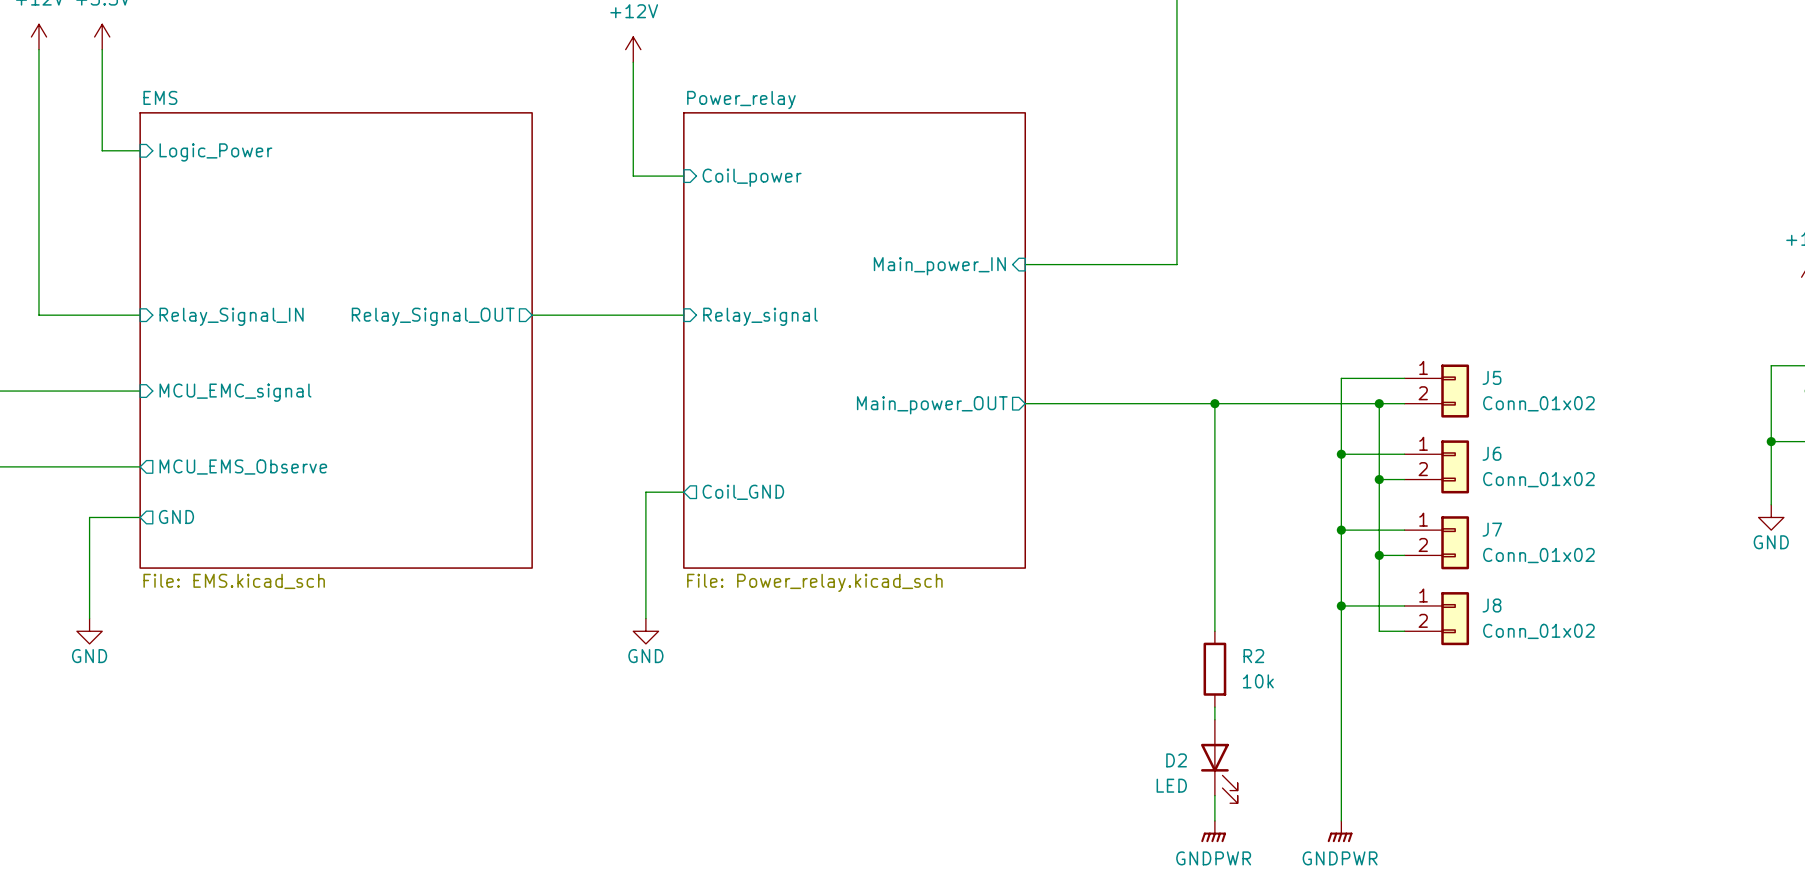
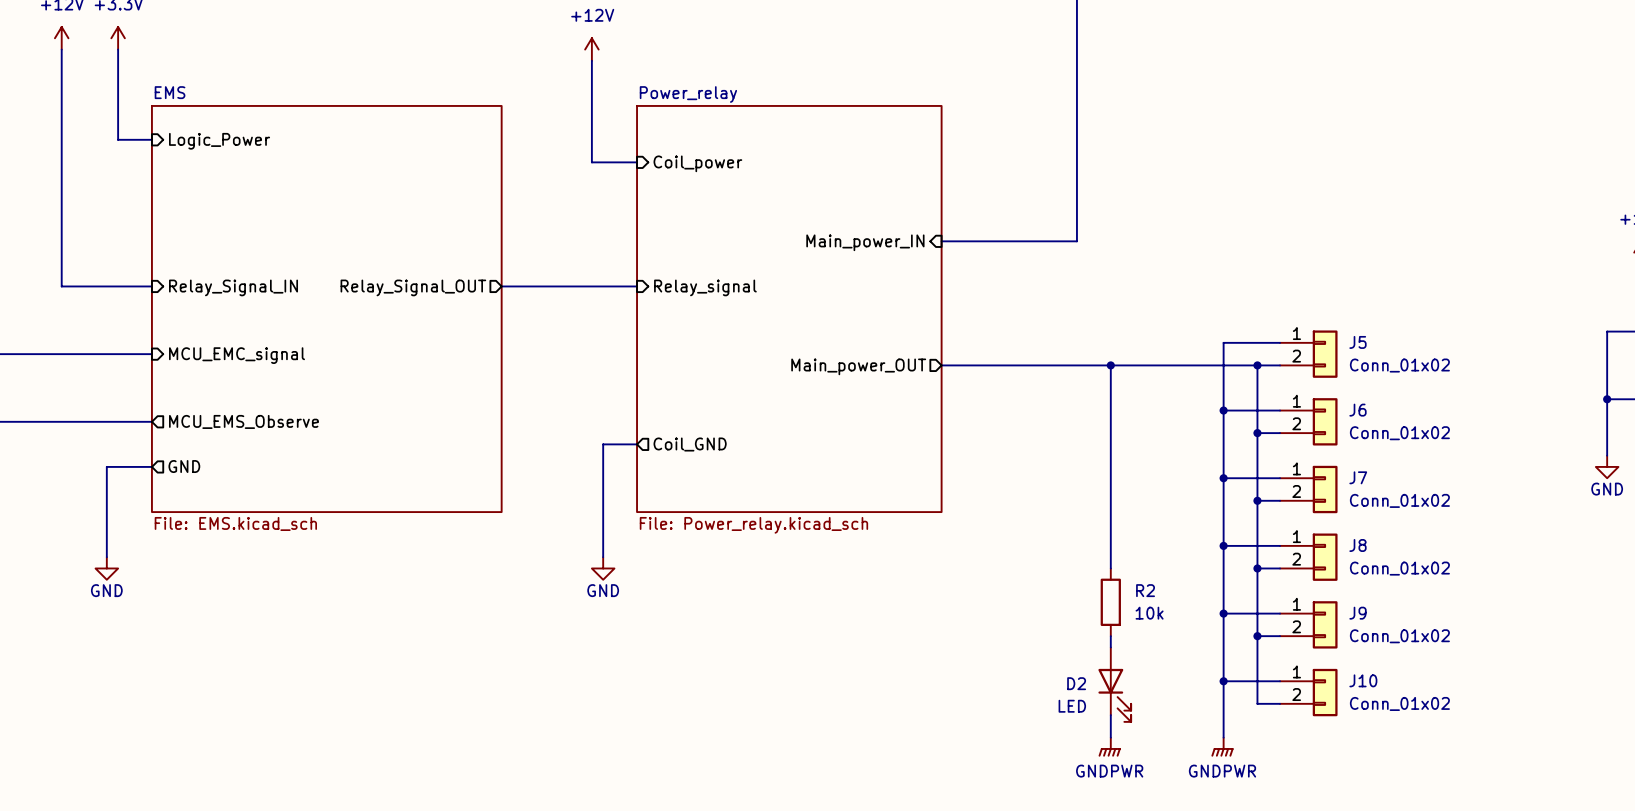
wire: none -> (1257, 568) (1257, 703) (1280, 703)
junction: none -> (1257, 568)
wire: none -> (1223, 613) (1280, 613)
junction: none -> (1223, 613)
J9: none -> Conn_01x02 (1308, 624)
wire: none -> (1257, 636) (1280, 636)
junction: none -> (1257, 636)
wire: none -> (1223, 681) (1280, 681)
junction: none -> (1223, 681)
J10: none -> Conn_01x02 (1308, 692)

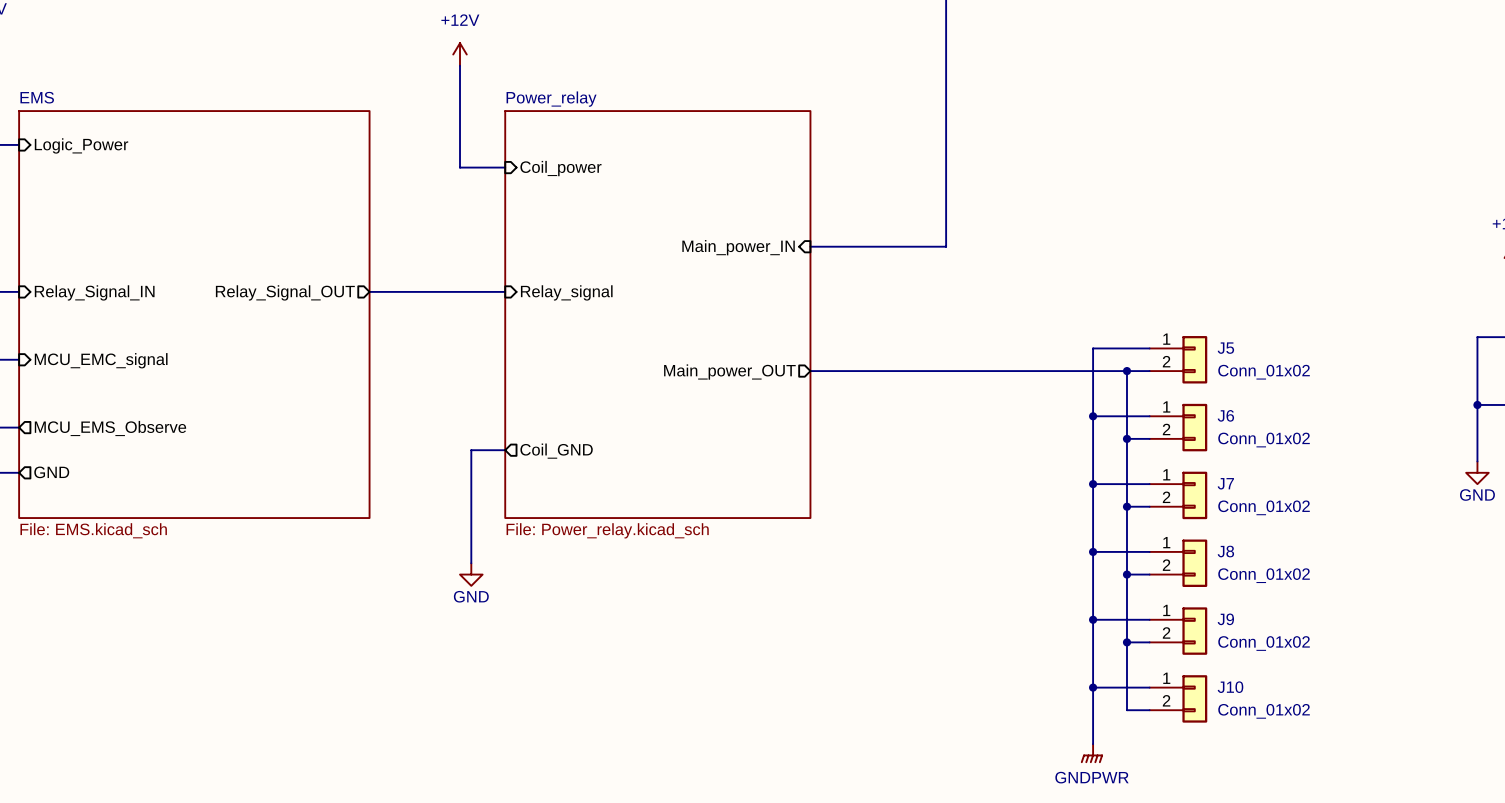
wire: (1110, 365) (1110, 568) -> none
junction: (1110, 365) -> none
R2: 10k (1110, 602) -> none
wire: (1110, 636) (1110, 647) -> none
D2: LED (1114, 684) -> none
wire: (1110, 715) (1110, 737) -> none
power symbol: GNDPWR (1109, 747) -> none

